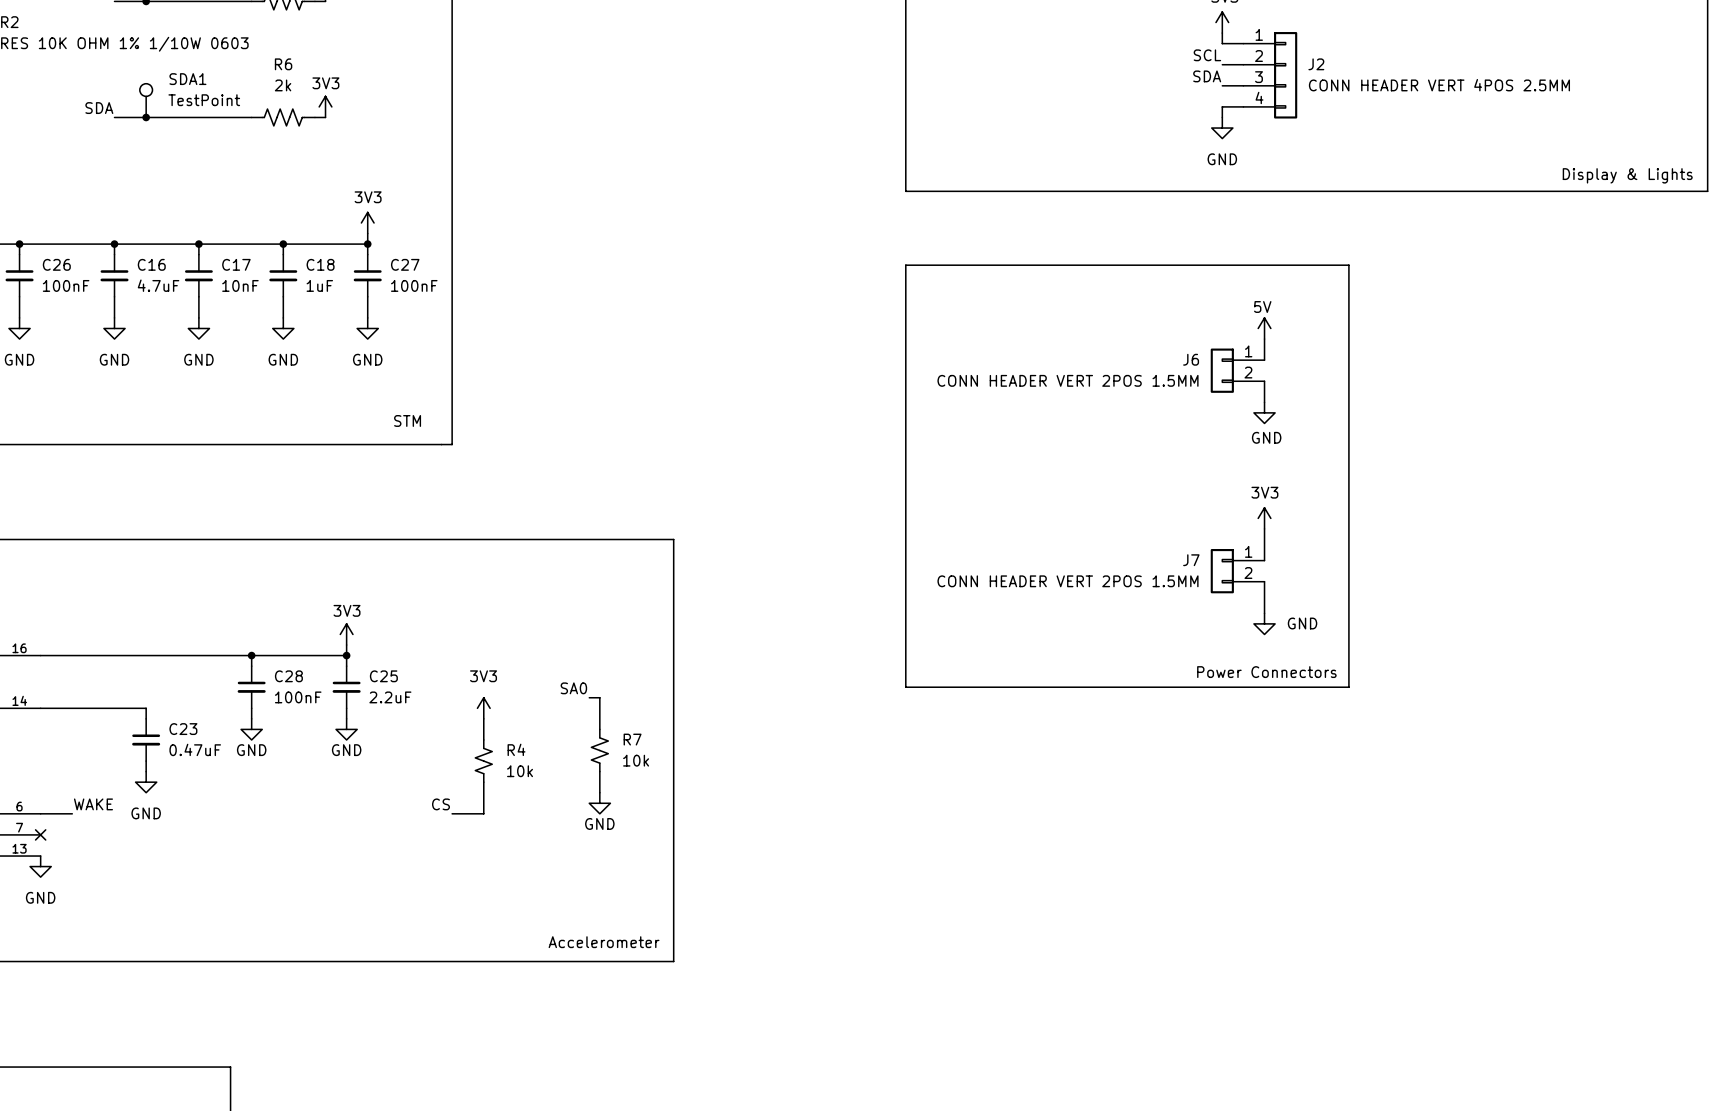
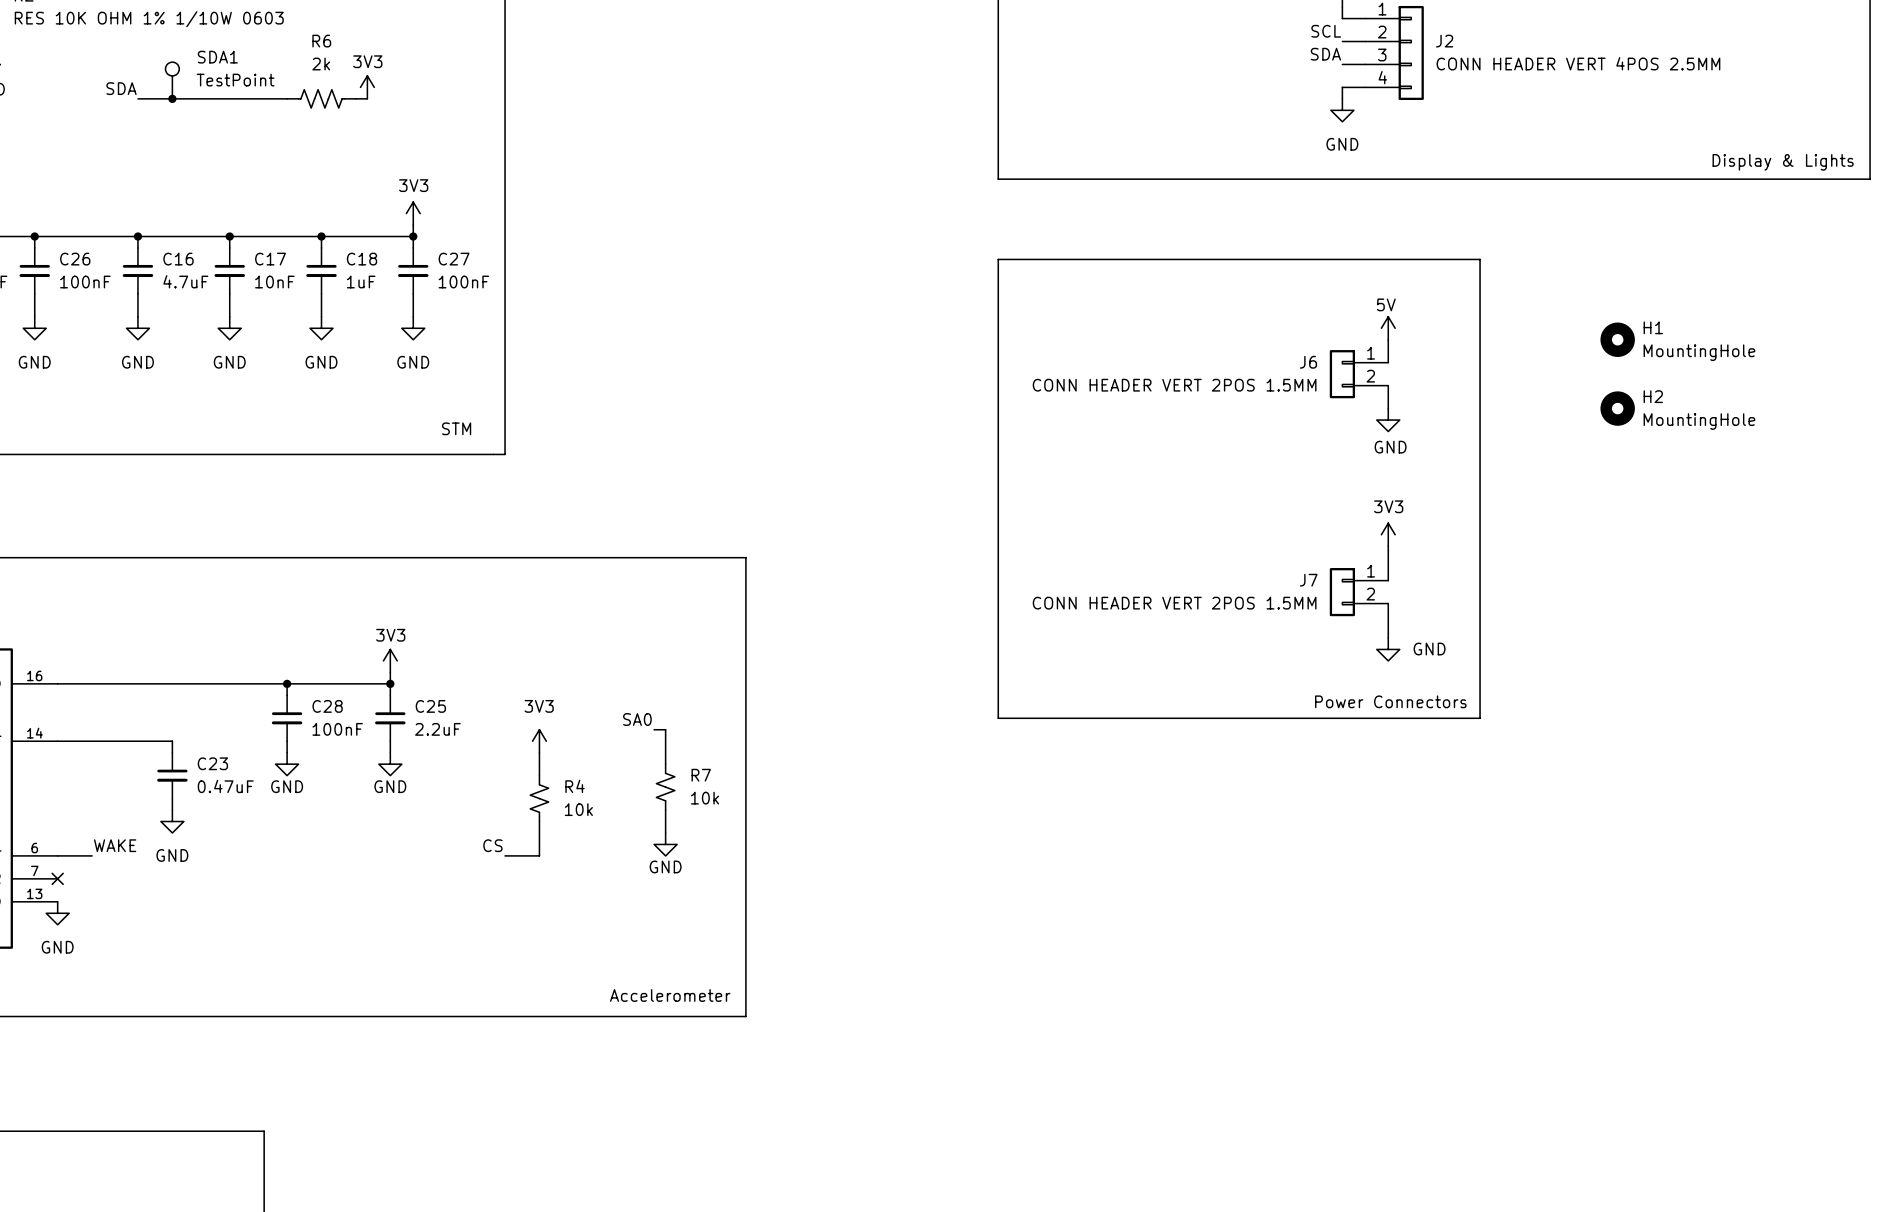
H1: none -> MountingHole (1617, 339)
H2: none -> MountingHole (1617, 408)

